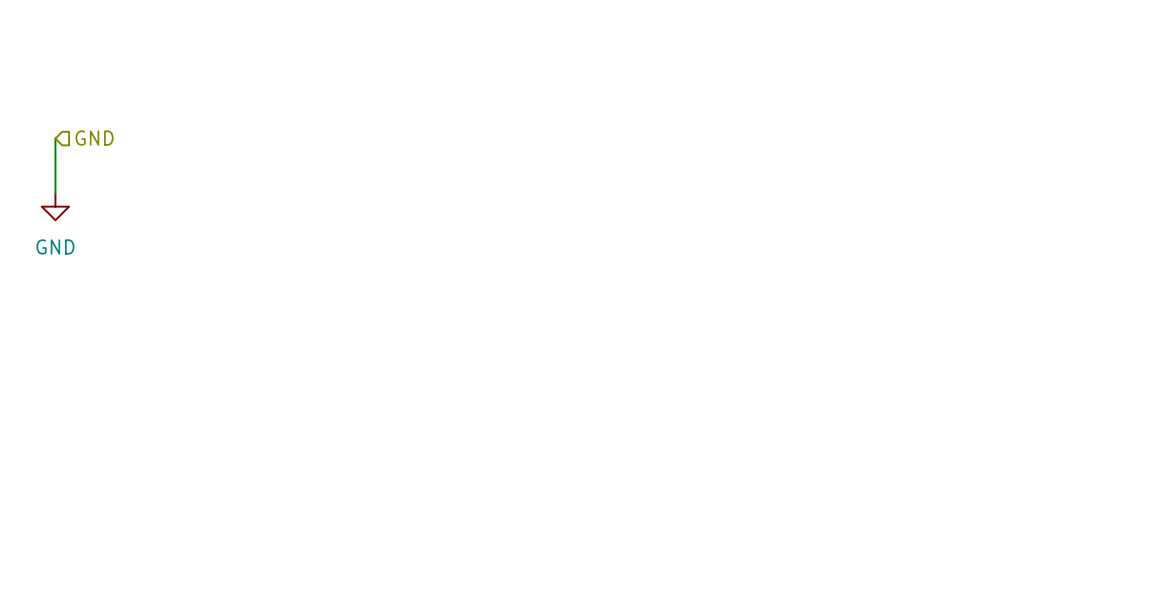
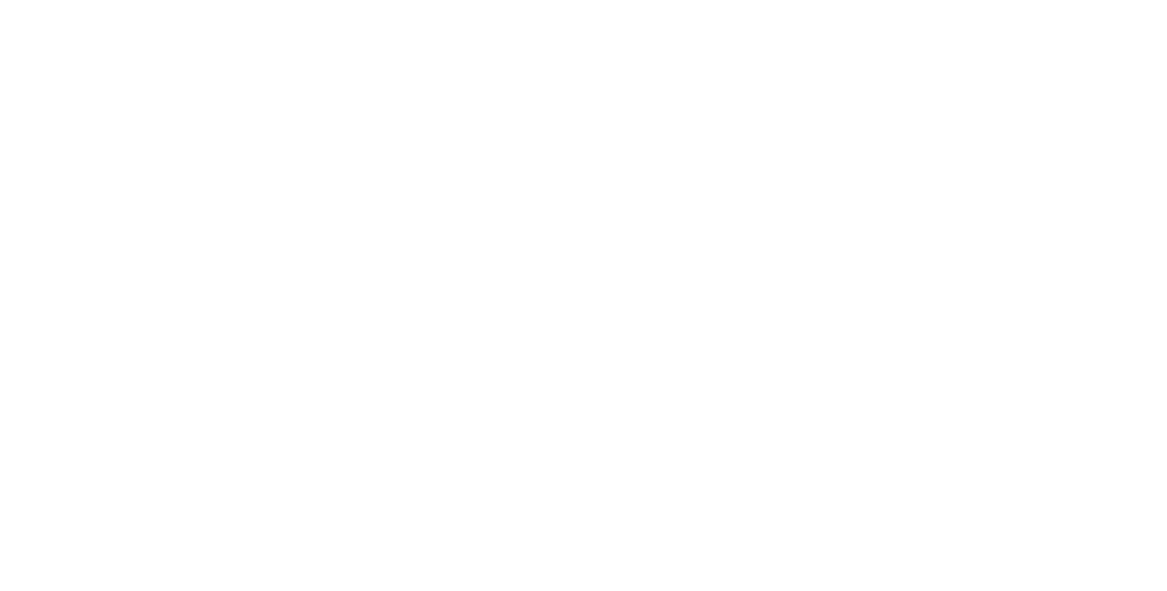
wire: (55, 138) (55, 193) -> none
hierarchical label: GND (94, 138) -> none
power symbol: GND (55, 206) -> none

